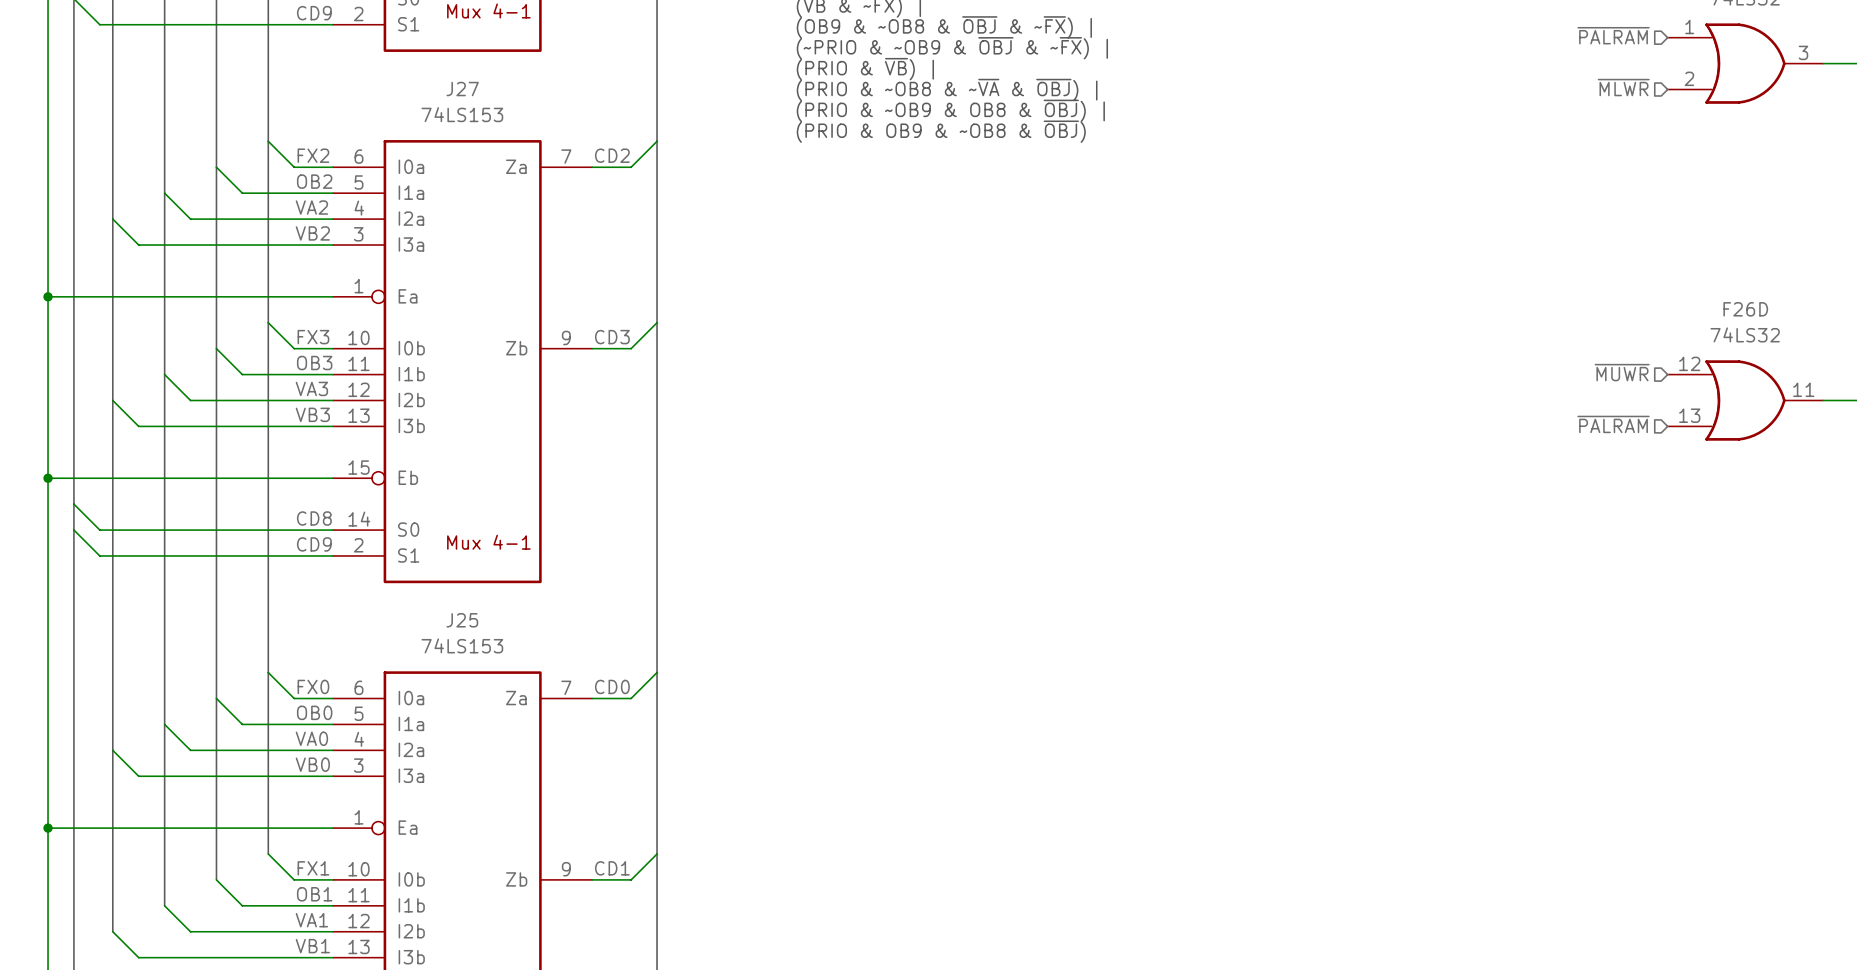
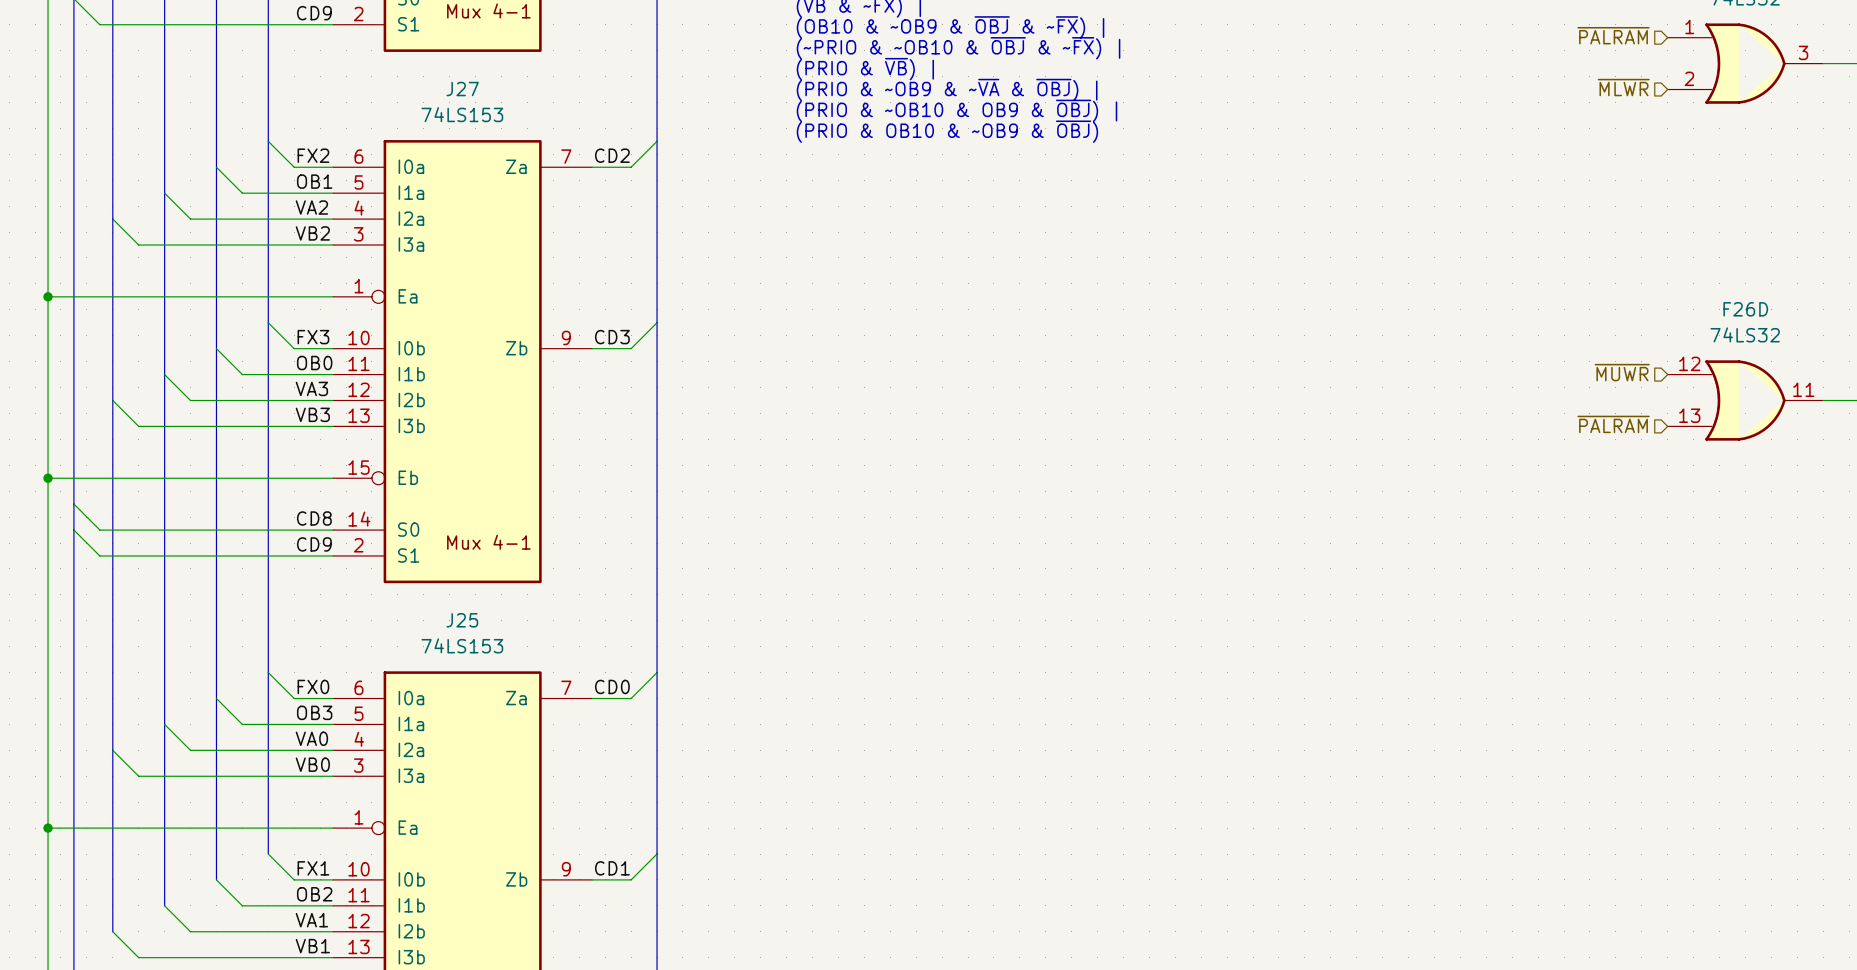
text: (OB9 & ~OB8 & ~{OBJ} & ~~{FX}) | (944, 27) -> (OB10 & ~OB9 & ~{OBJ} & ~~{FX}) | (950, 27)
text: (~PRIO & ~OB9 & ~{OBJ} & ~~{FX}) | (952, 48) -> (~PRIO & ~OB10 & ~{OBJ} & ~~{FX}) | (958, 48)
text: (PRIO & ~OB8 & ~~{VA} & ~{OBJ}) | (947, 89) -> (PRIO & ~OB9 & ~~{VA} & ~{OBJ}) | (947, 89)
text: (PRIO & ~OB9 & OB8 & ~{OBJ}) | (950, 110) -> (PRIO & ~OB10 & OB9 & ~{OBJ}) | (956, 110)
text: (PRIO & OB9 & ~OB8 & ~{OBJ}) (941, 131) -> (PRIO & OB10 & ~OB9 & ~{OBJ}) (947, 131)
label: OB2 (314, 181) -> OB1 (314, 181)
label: OB3 (314, 363) -> OB0 (314, 363)
label: OB0 (314, 712) -> OB3 (314, 712)
label: OB1 (314, 894) -> OB2 (314, 894)

